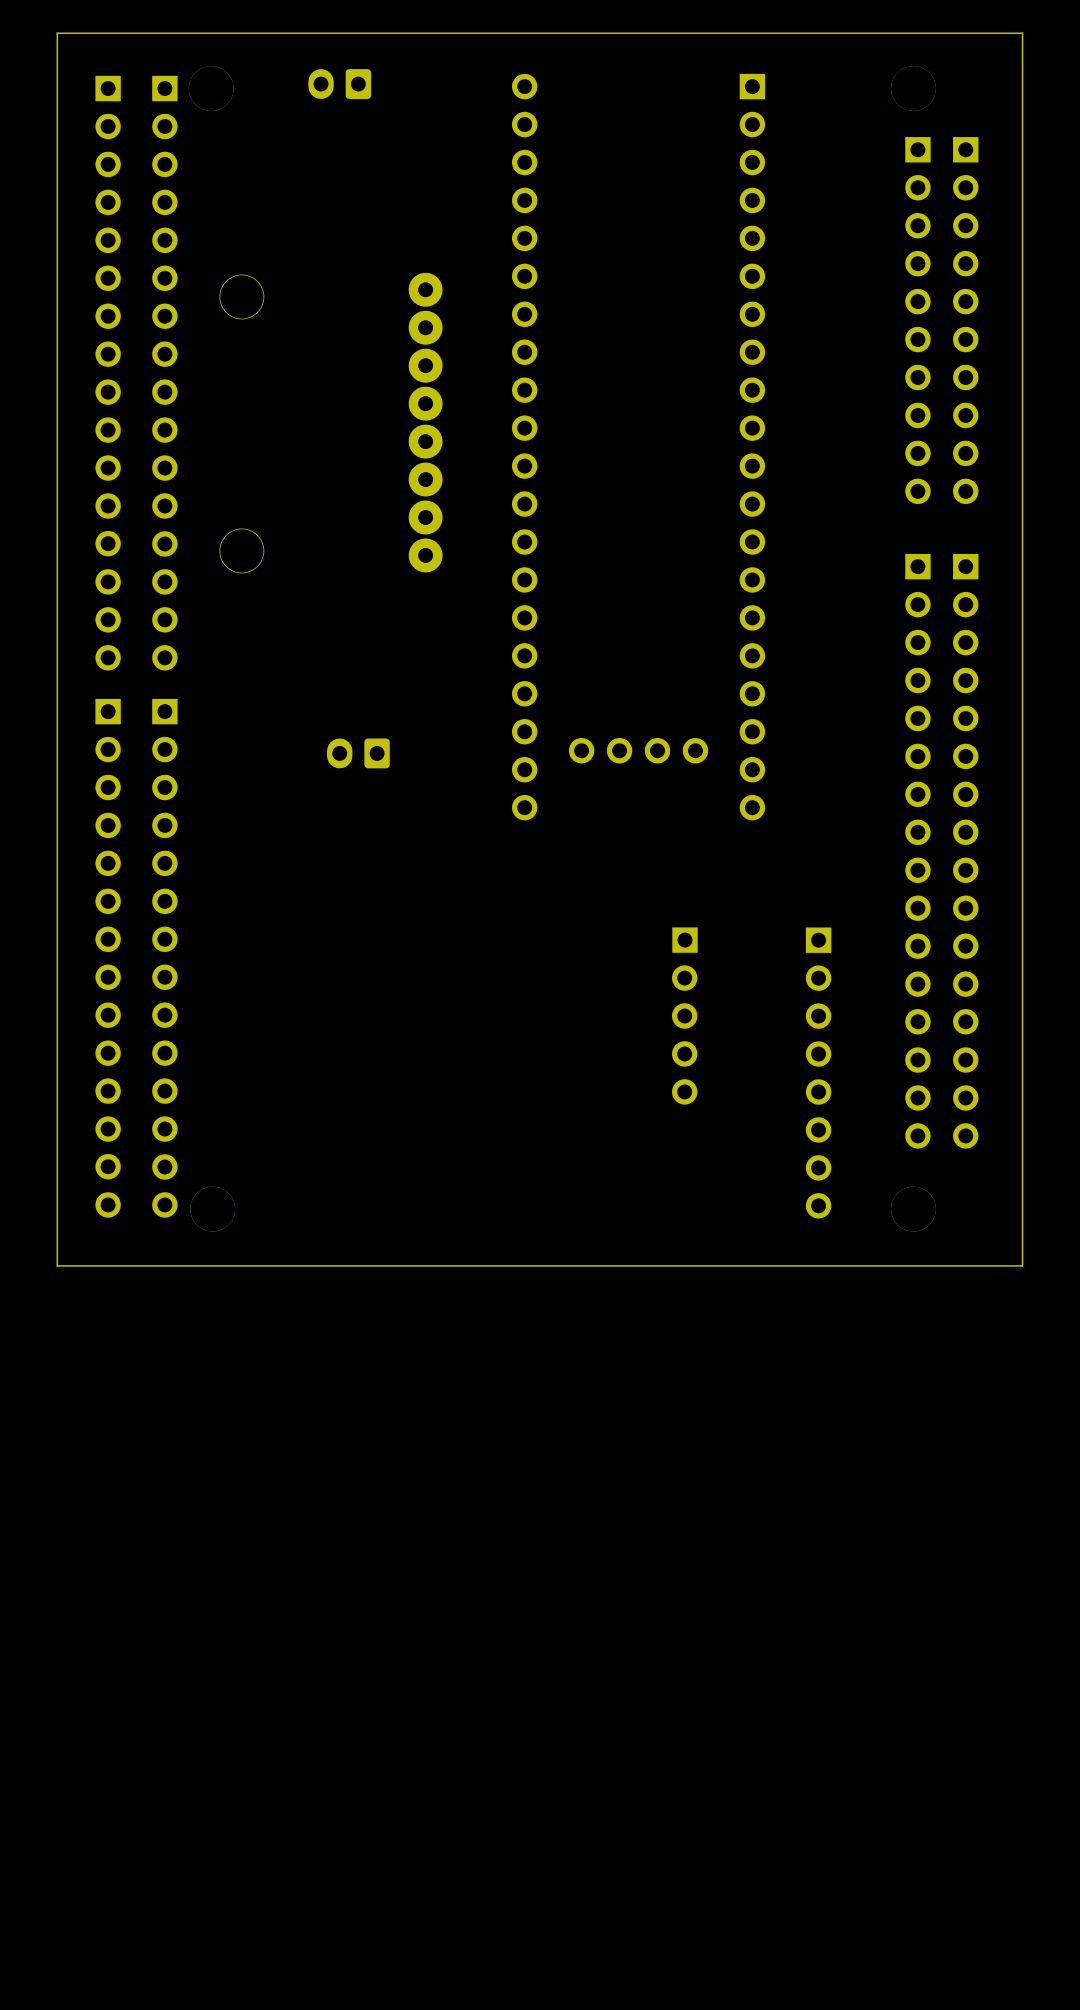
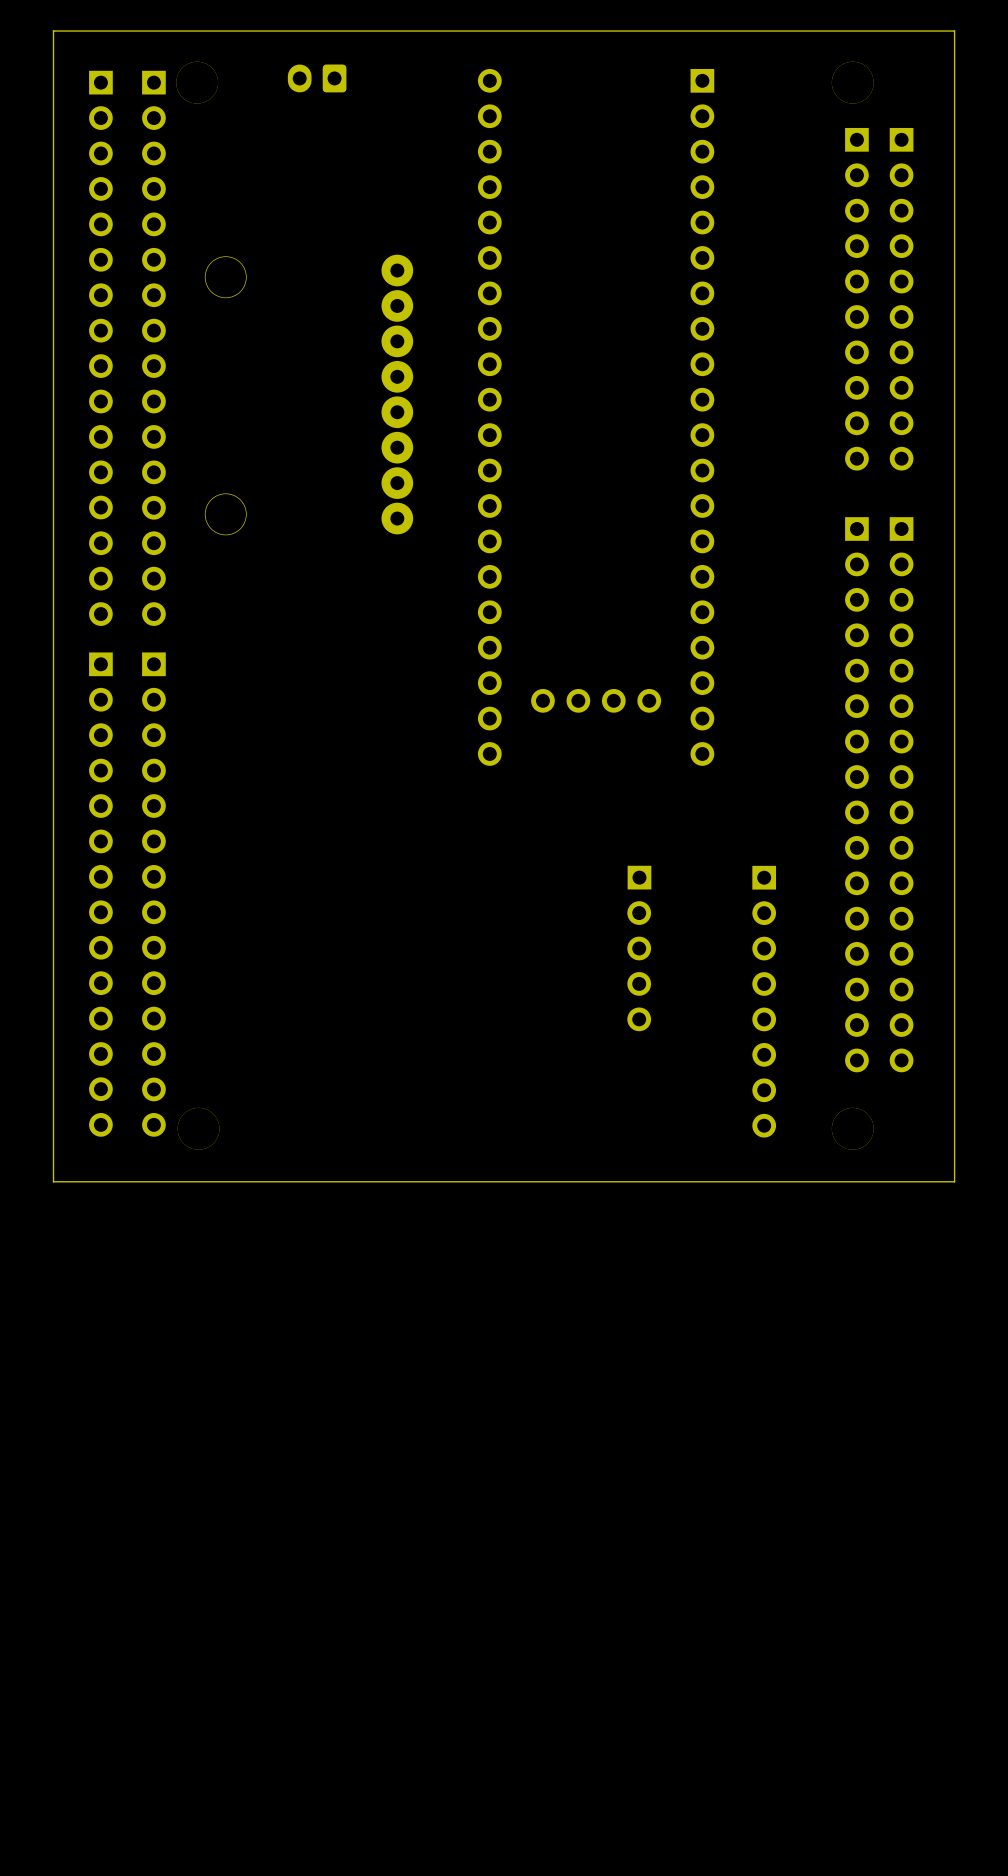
part: (358, 753) -> none

